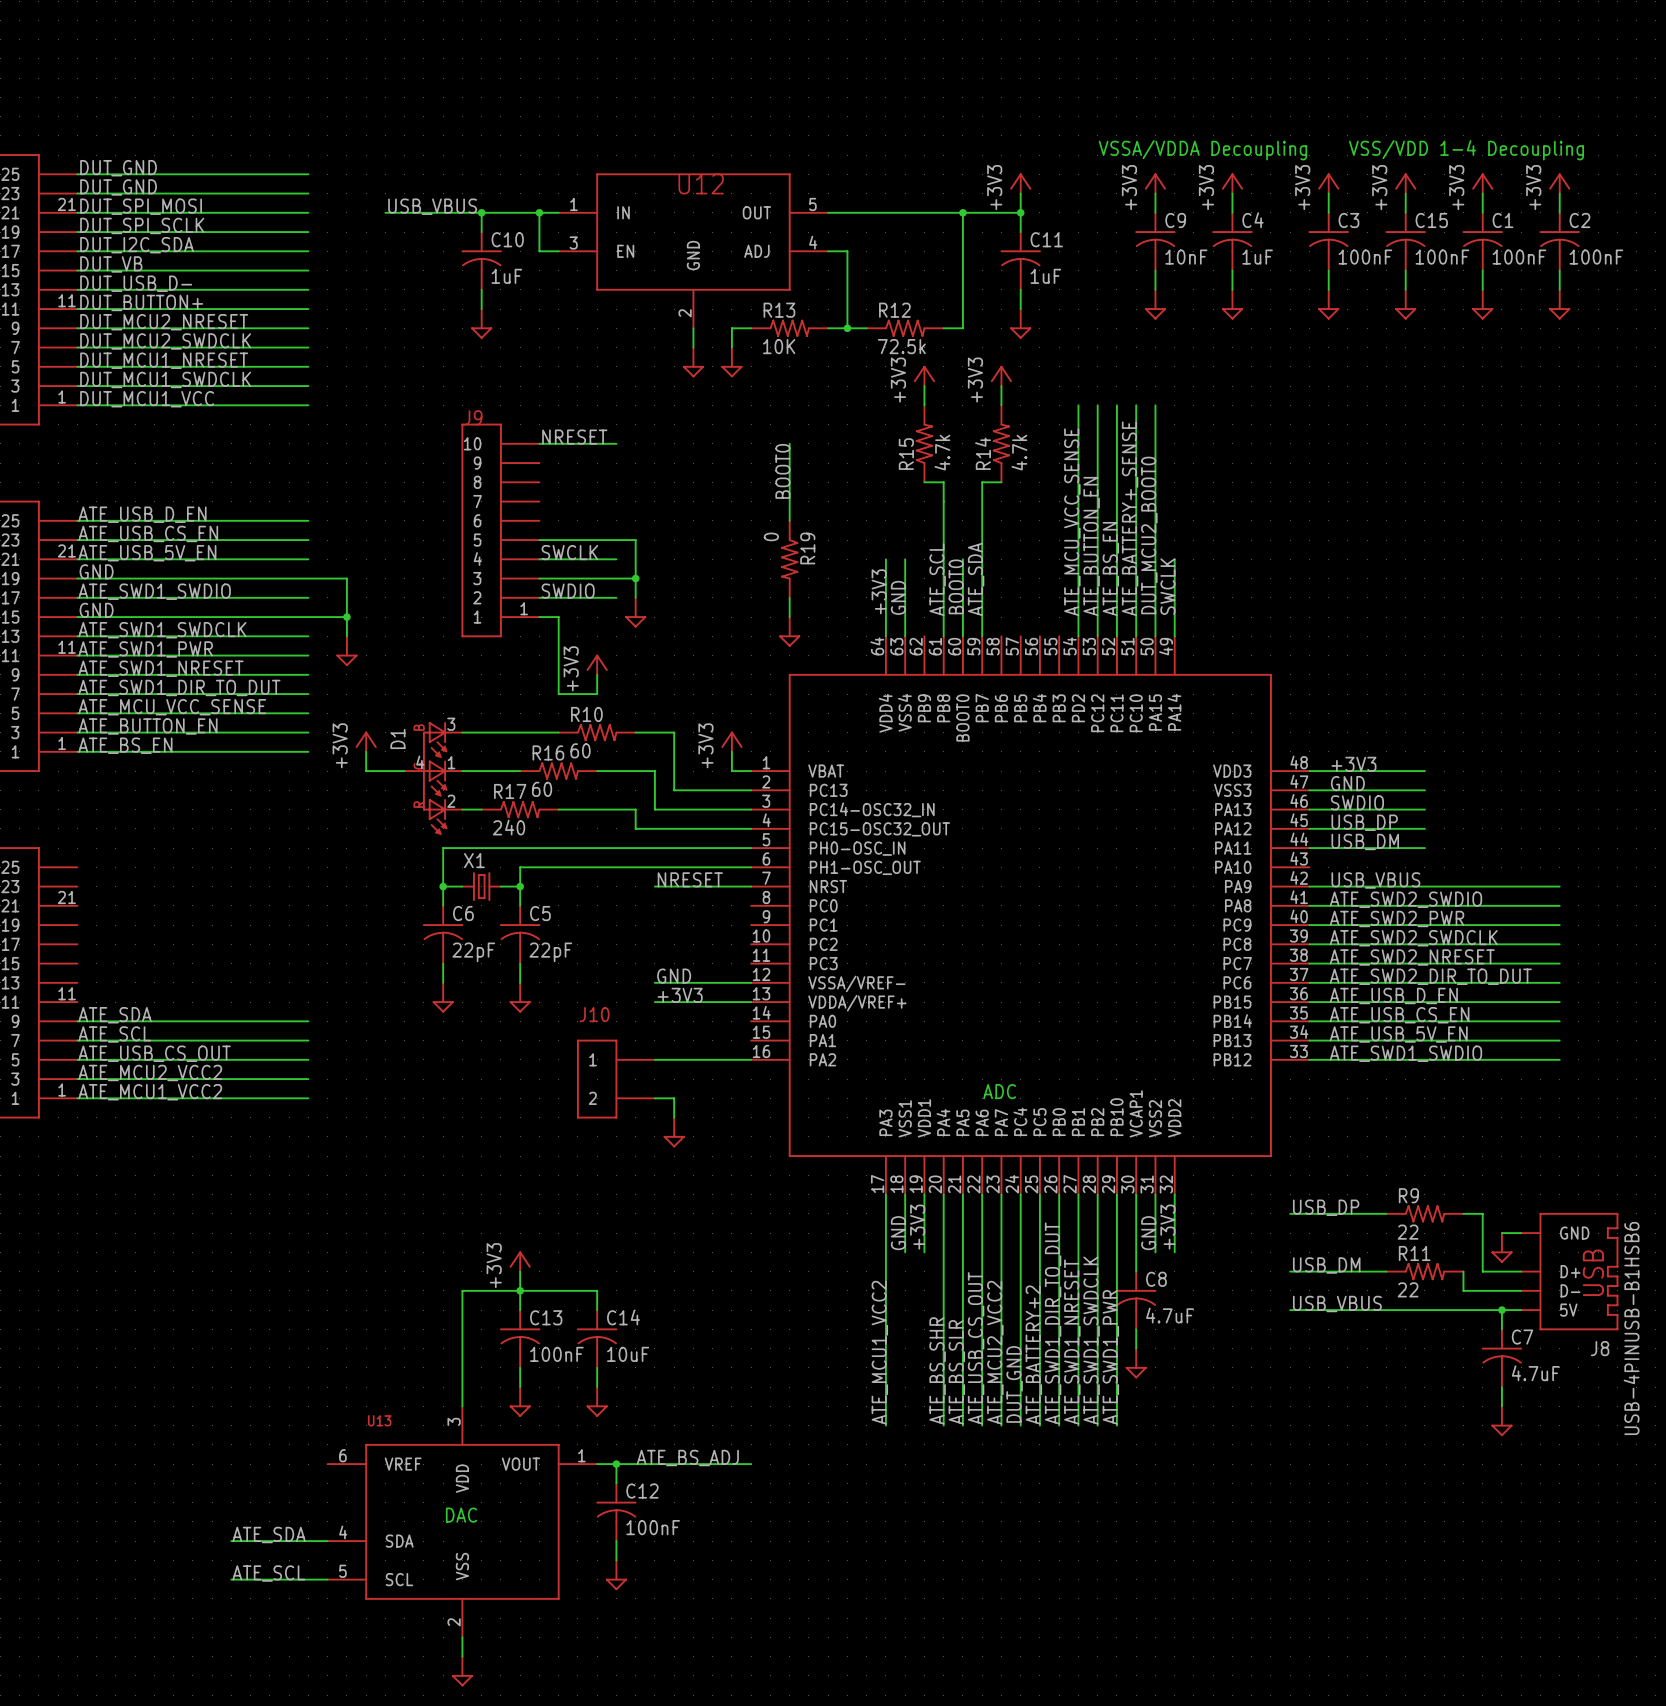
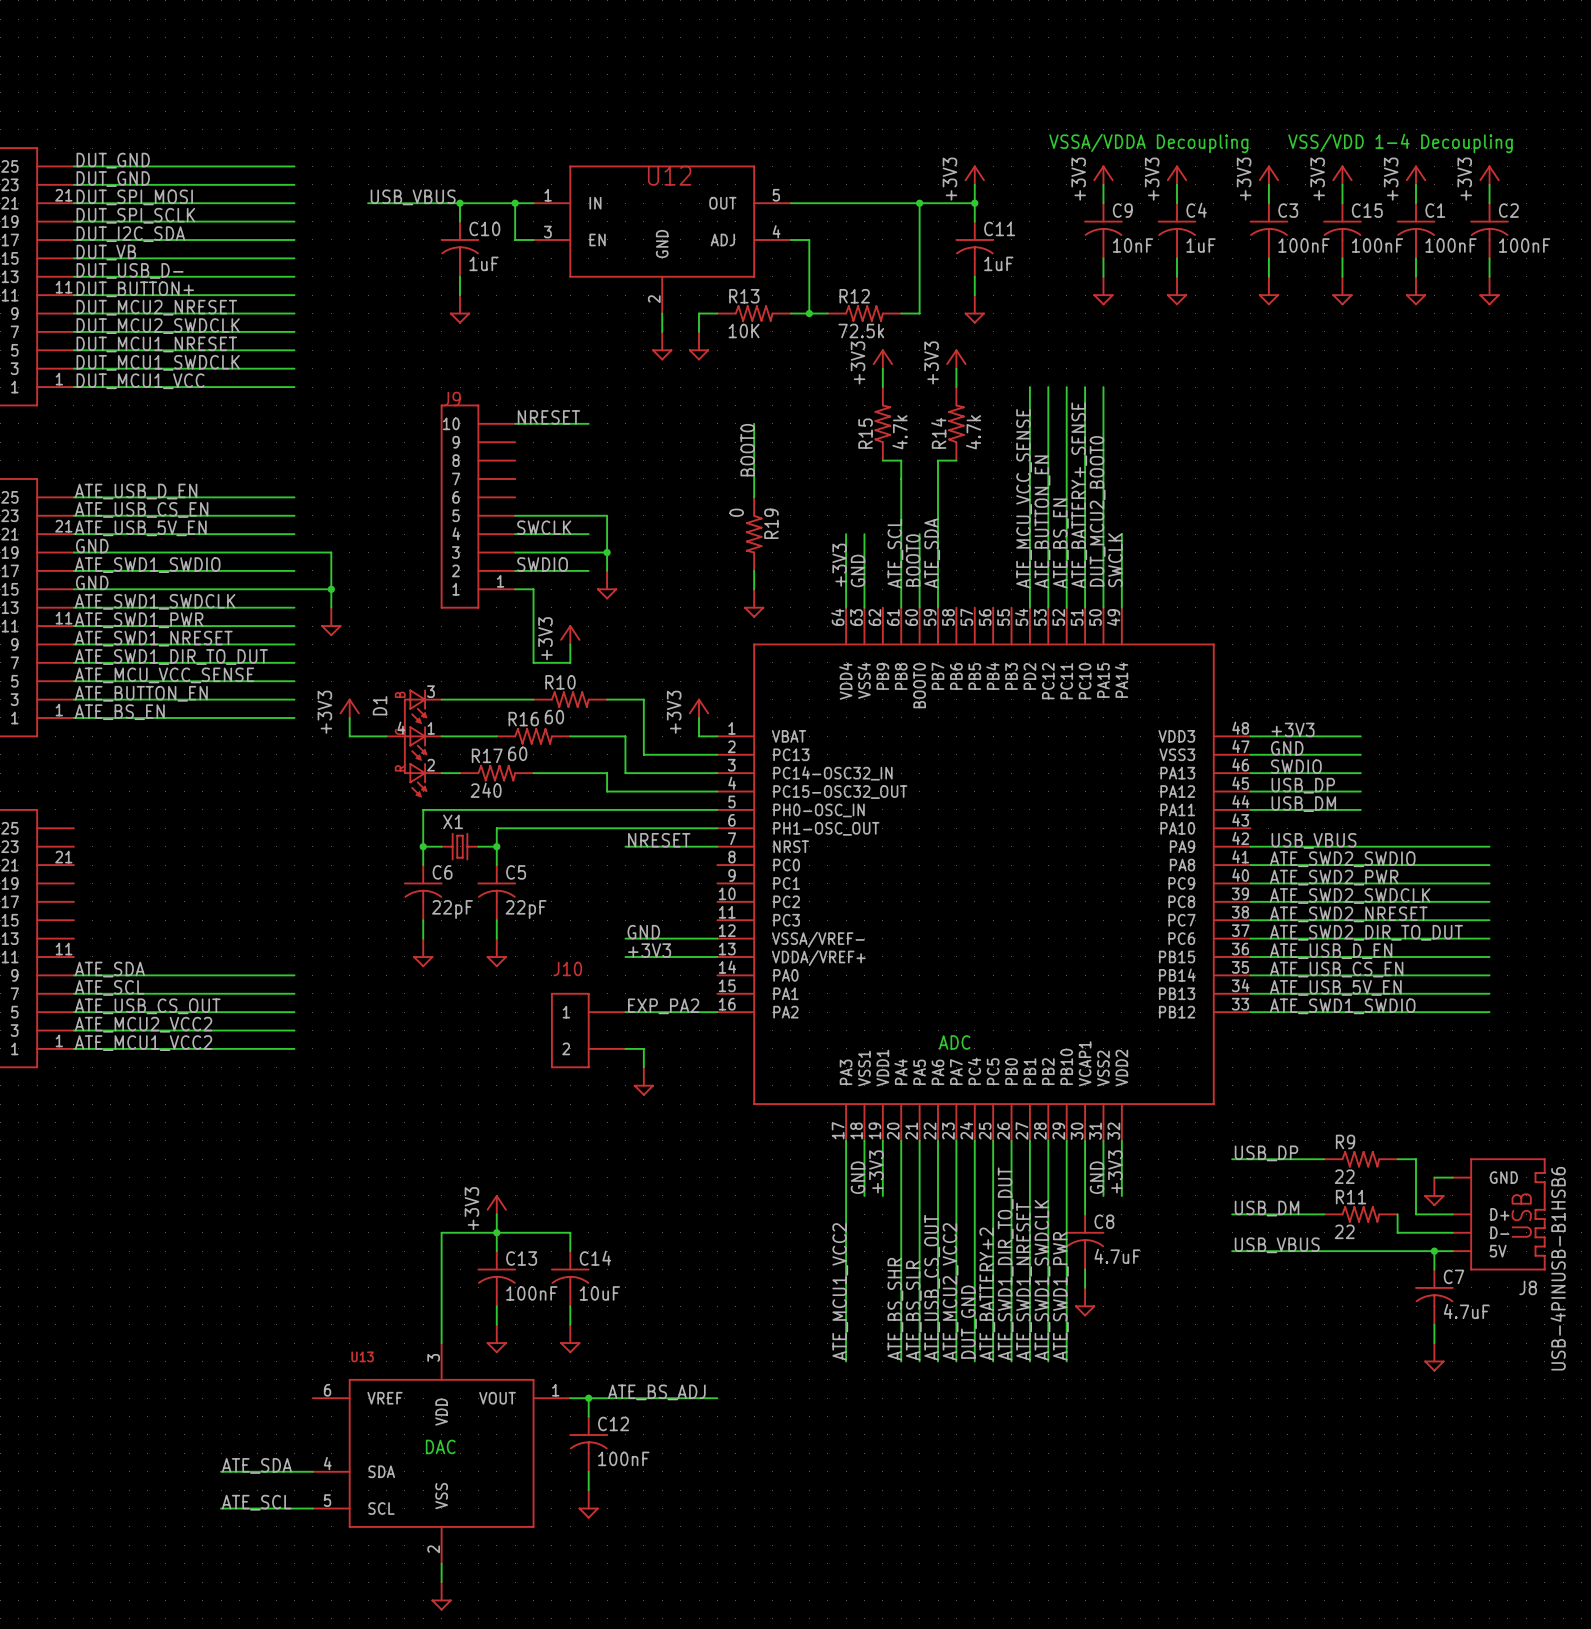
label: none -> EXP_PA2 (663, 1006)

